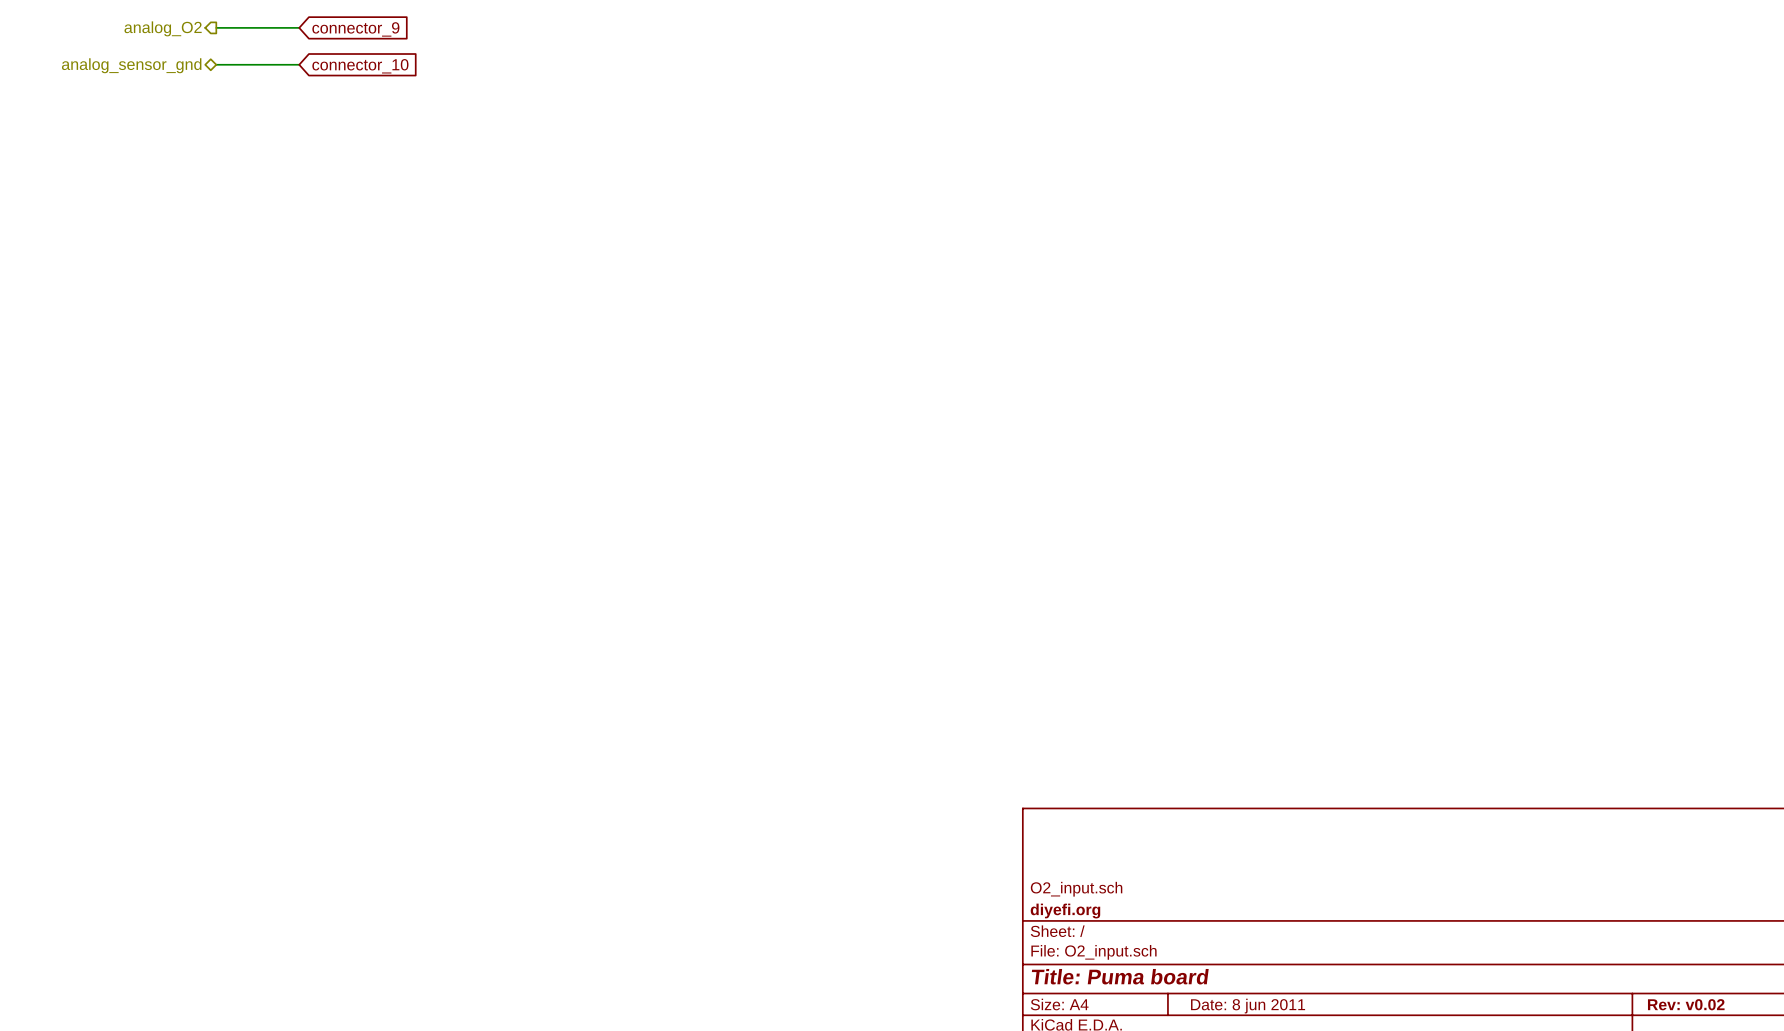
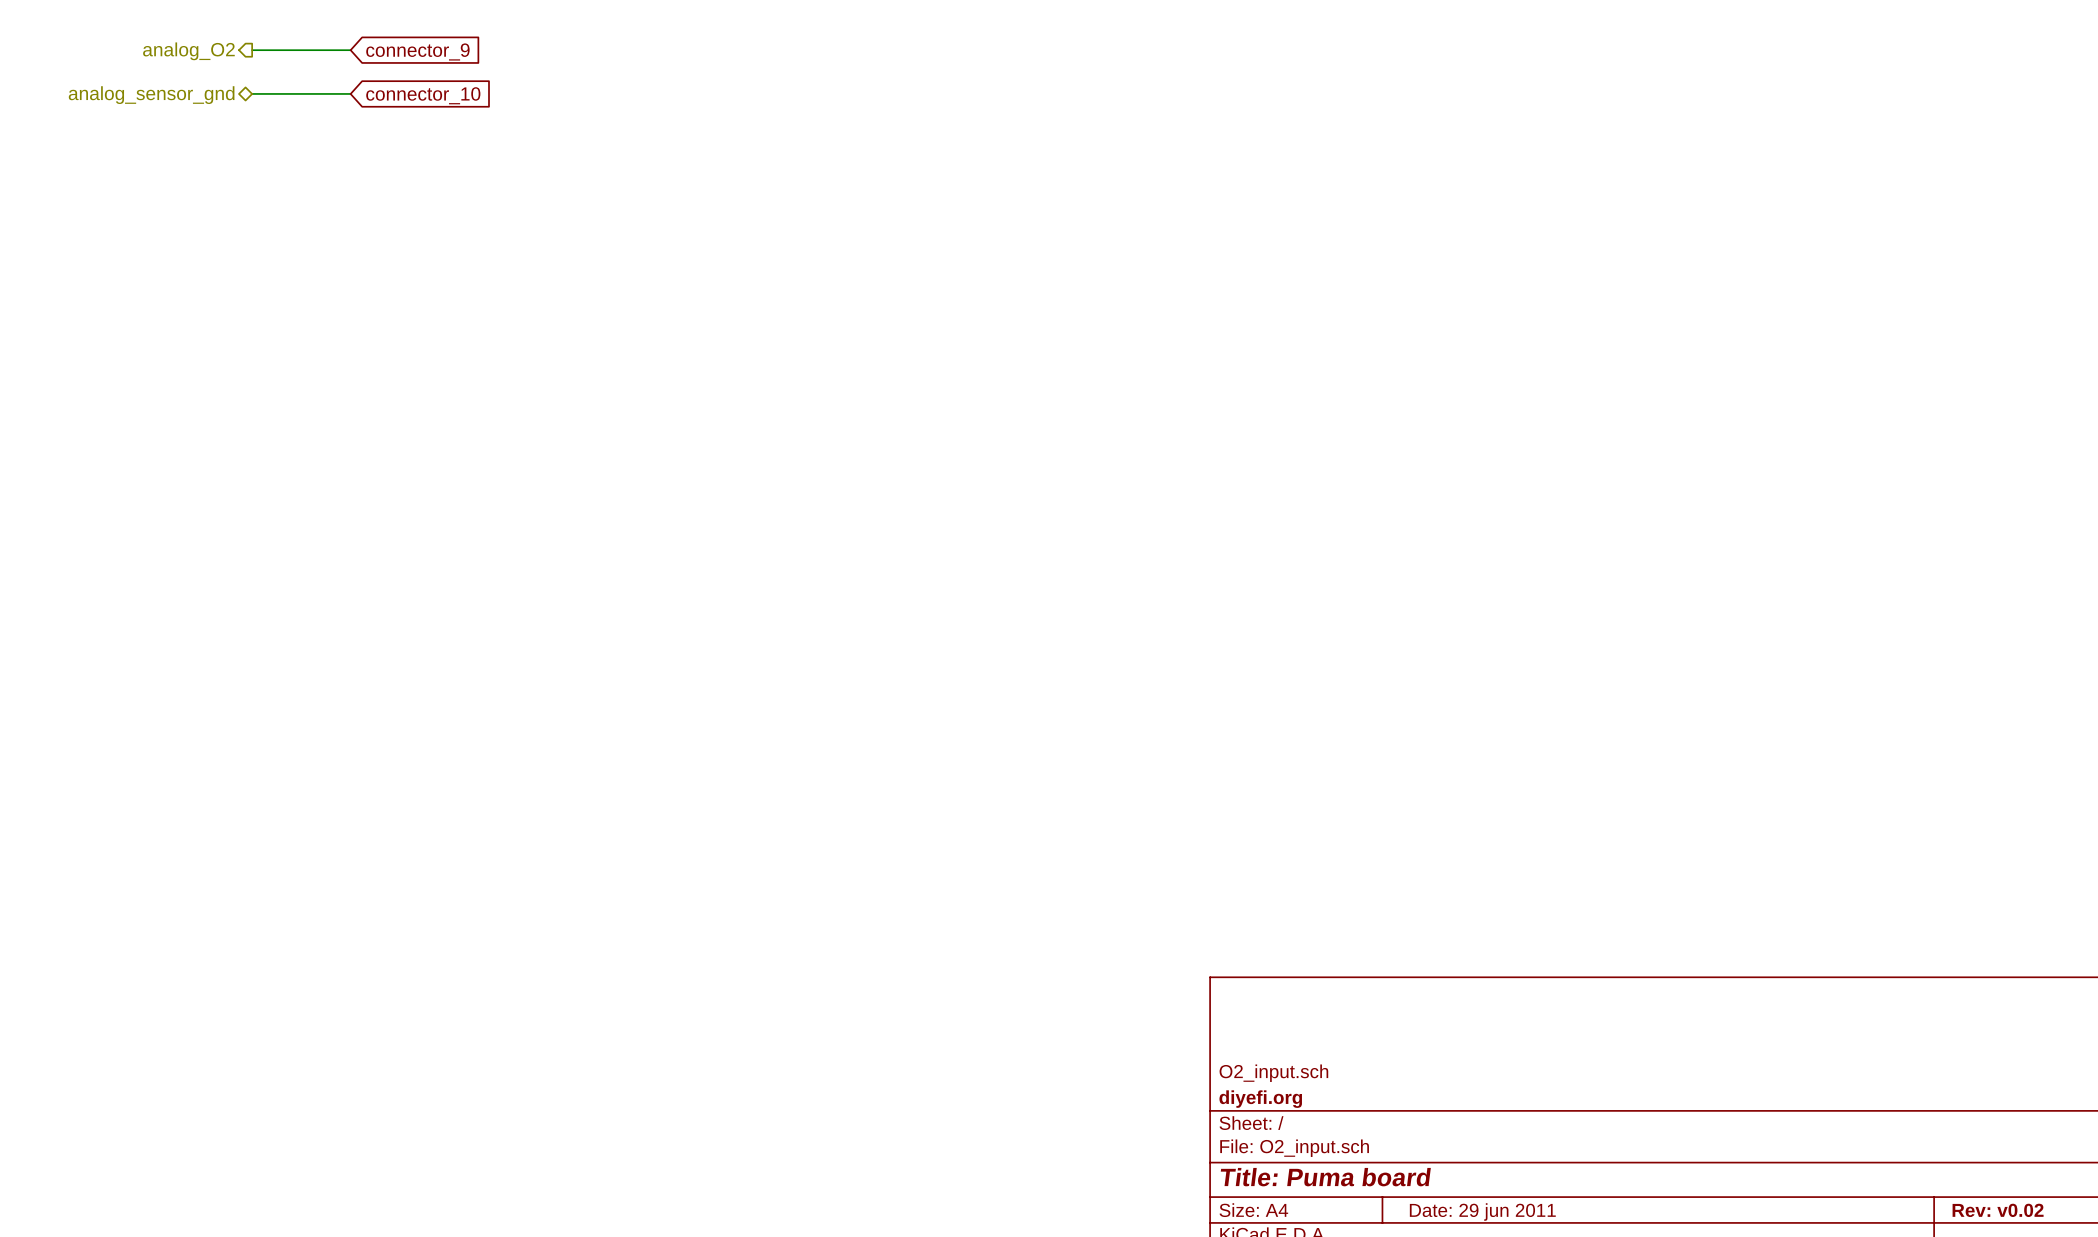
title block: Date: 8 jun 2011 (1248, 1006) -> Date: 29 jun 2011 (1482, 1211)

